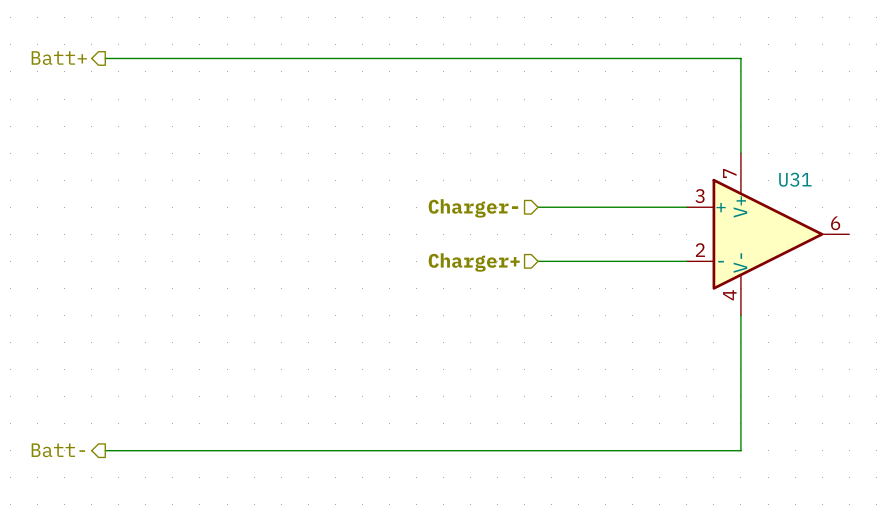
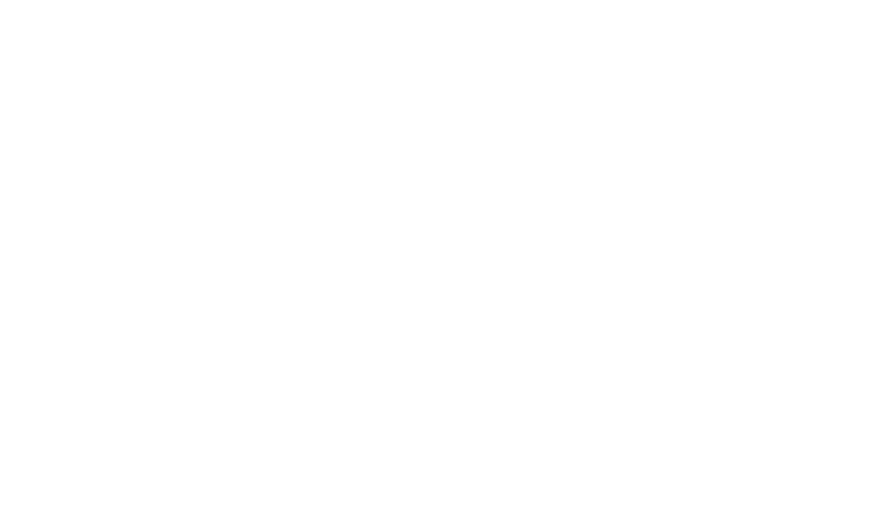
hierarchical label: Batt+ (59, 58) -> none
wire: (105, 58) (740, 58) (740, 153) -> none
wire: (538, 207) (686, 207) -> none
hierarchical label: Charger- (473, 208) -> none
U31: (768, 234) -> none
wire: (538, 261) (686, 261) -> none
hierarchical label: Charger+ (474, 262) -> none
wire: (740, 315) (740, 450) (105, 450) -> none
hierarchical label: Batt- (58, 450) -> none

